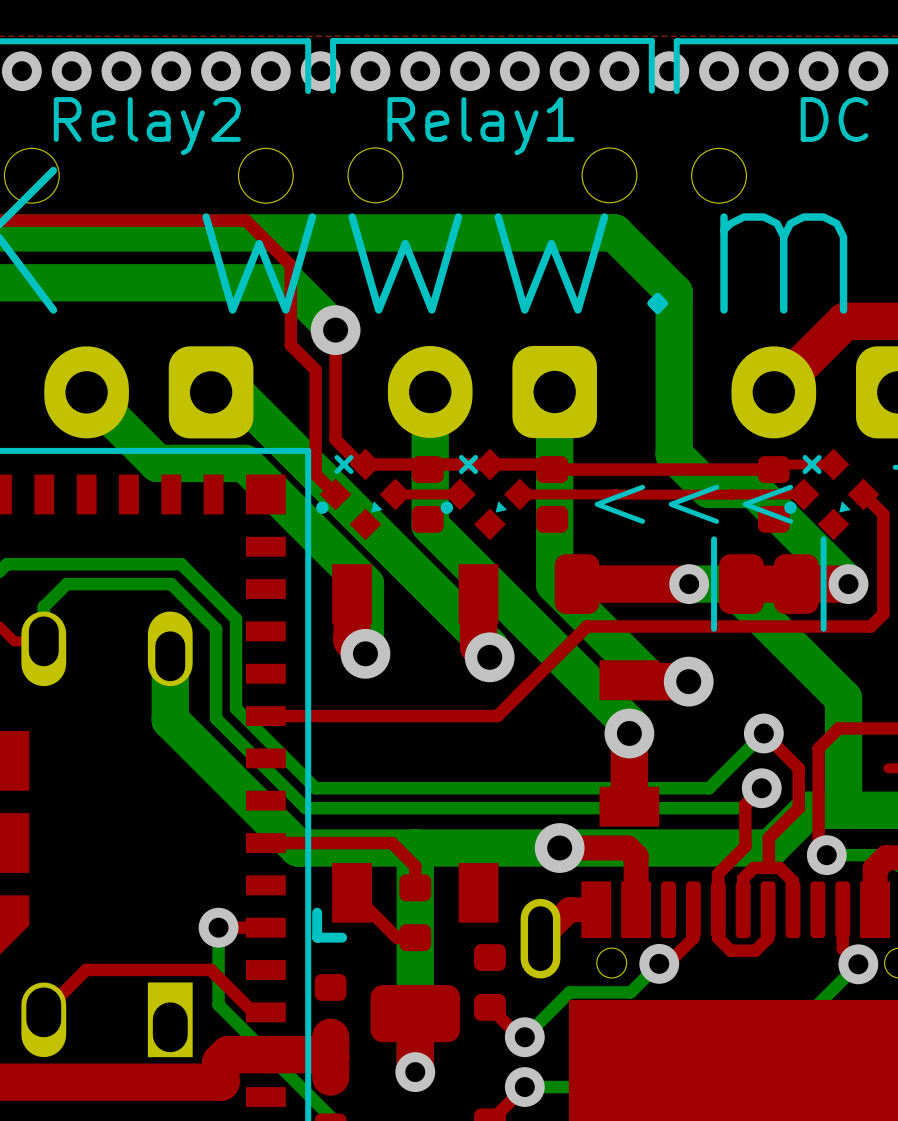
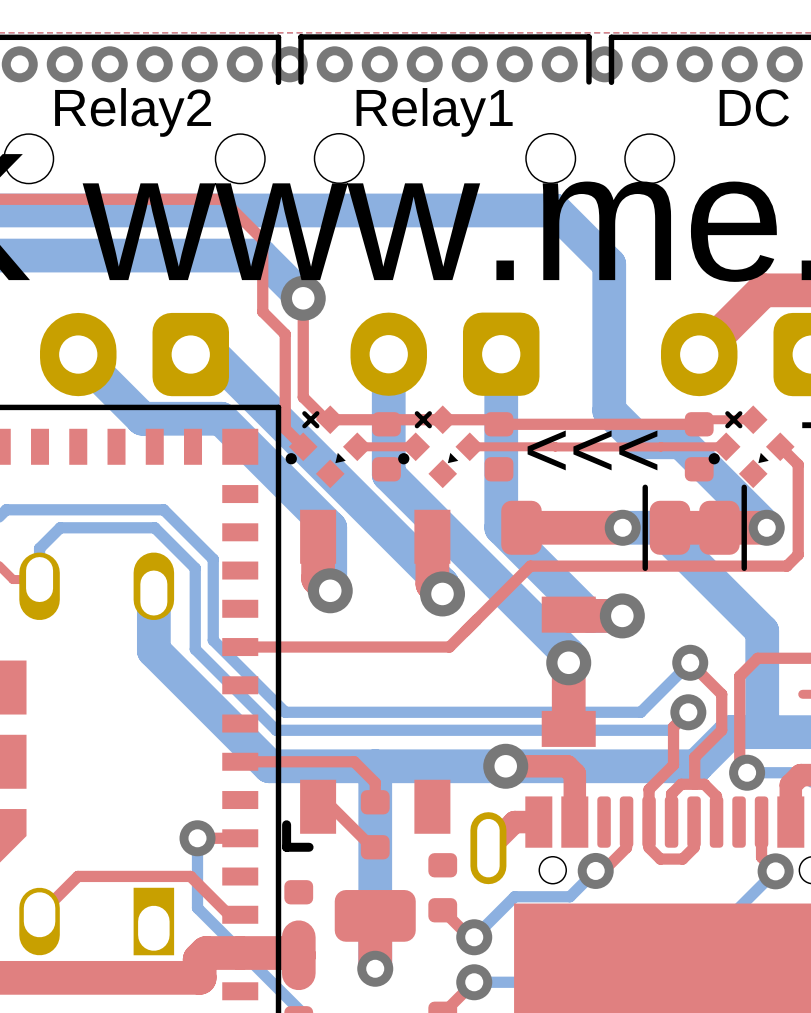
top track: (352, 892) (396, 937) (411, 937) -> (331, 806) (372, 847)

